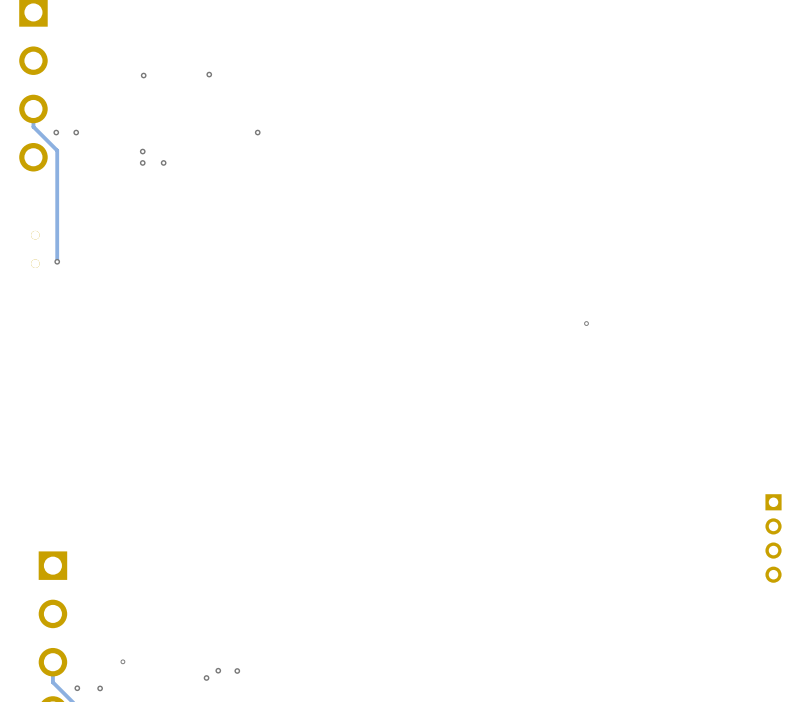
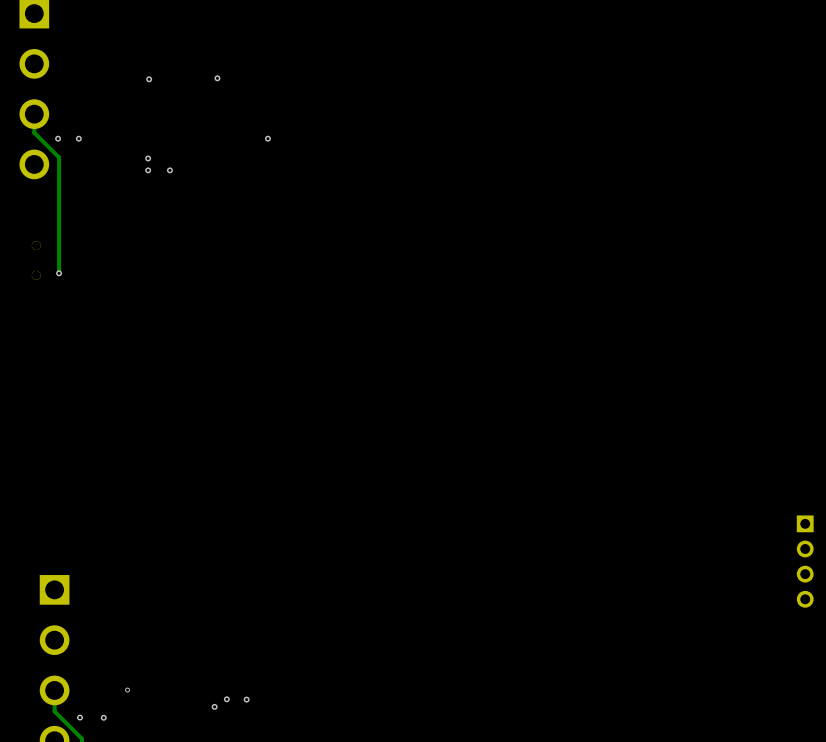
via: (586, 323) -> none

